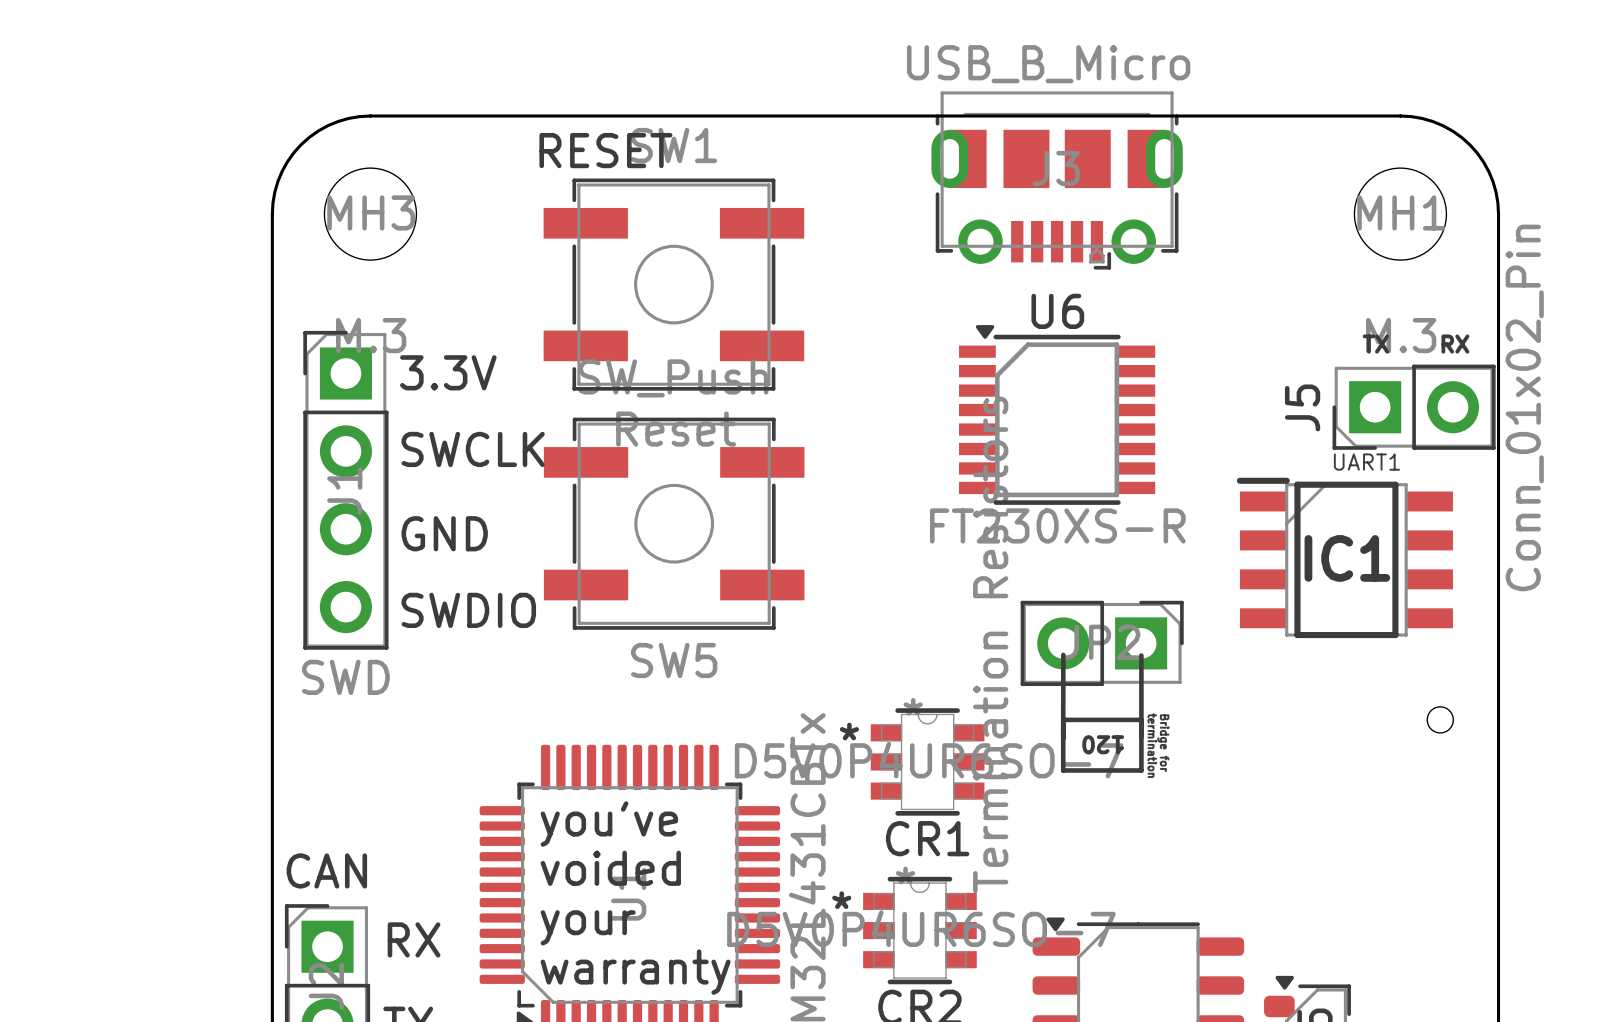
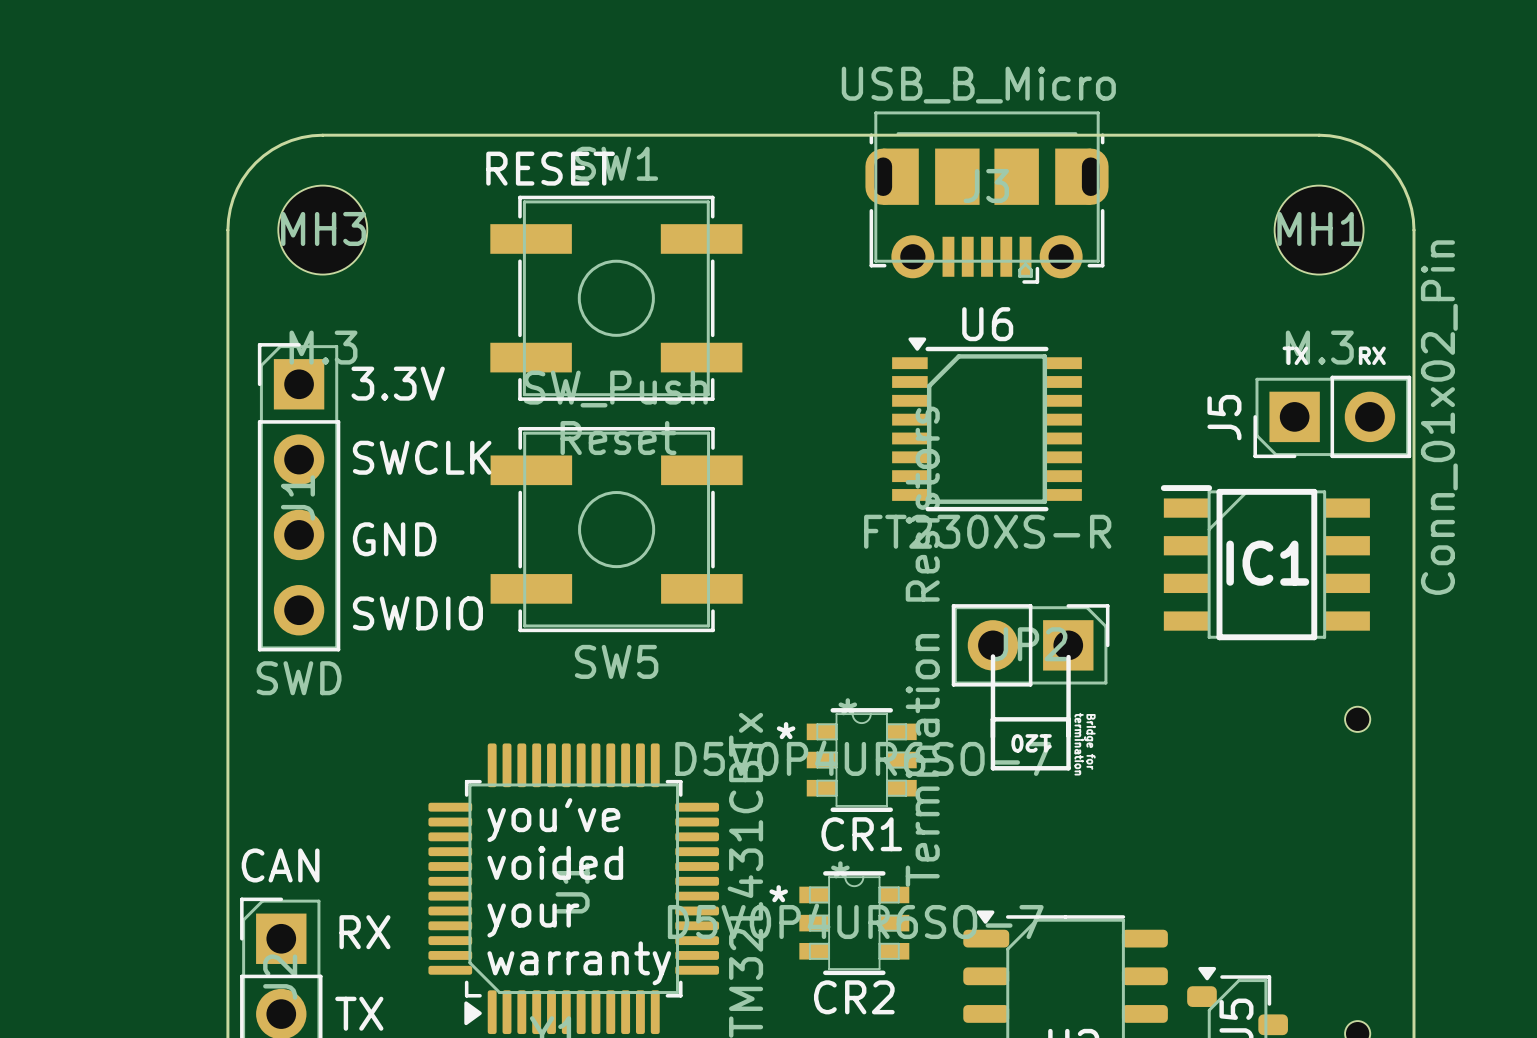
text: UART1 (1366, 462) -> none

